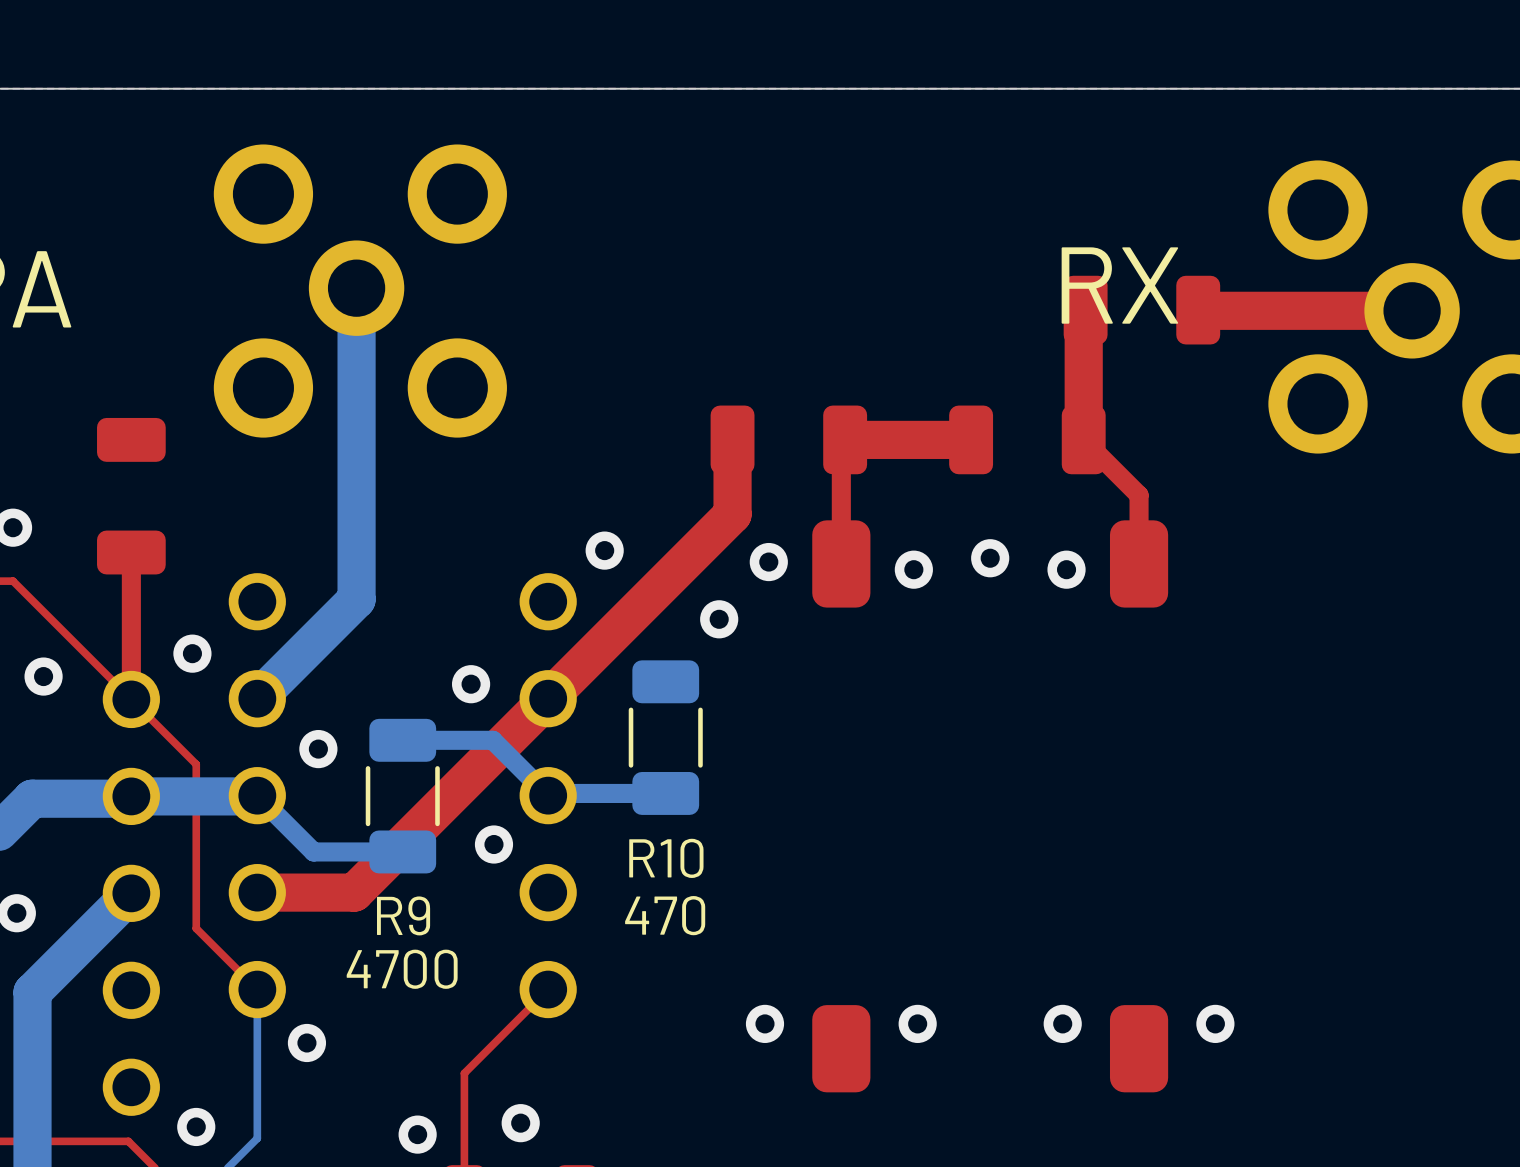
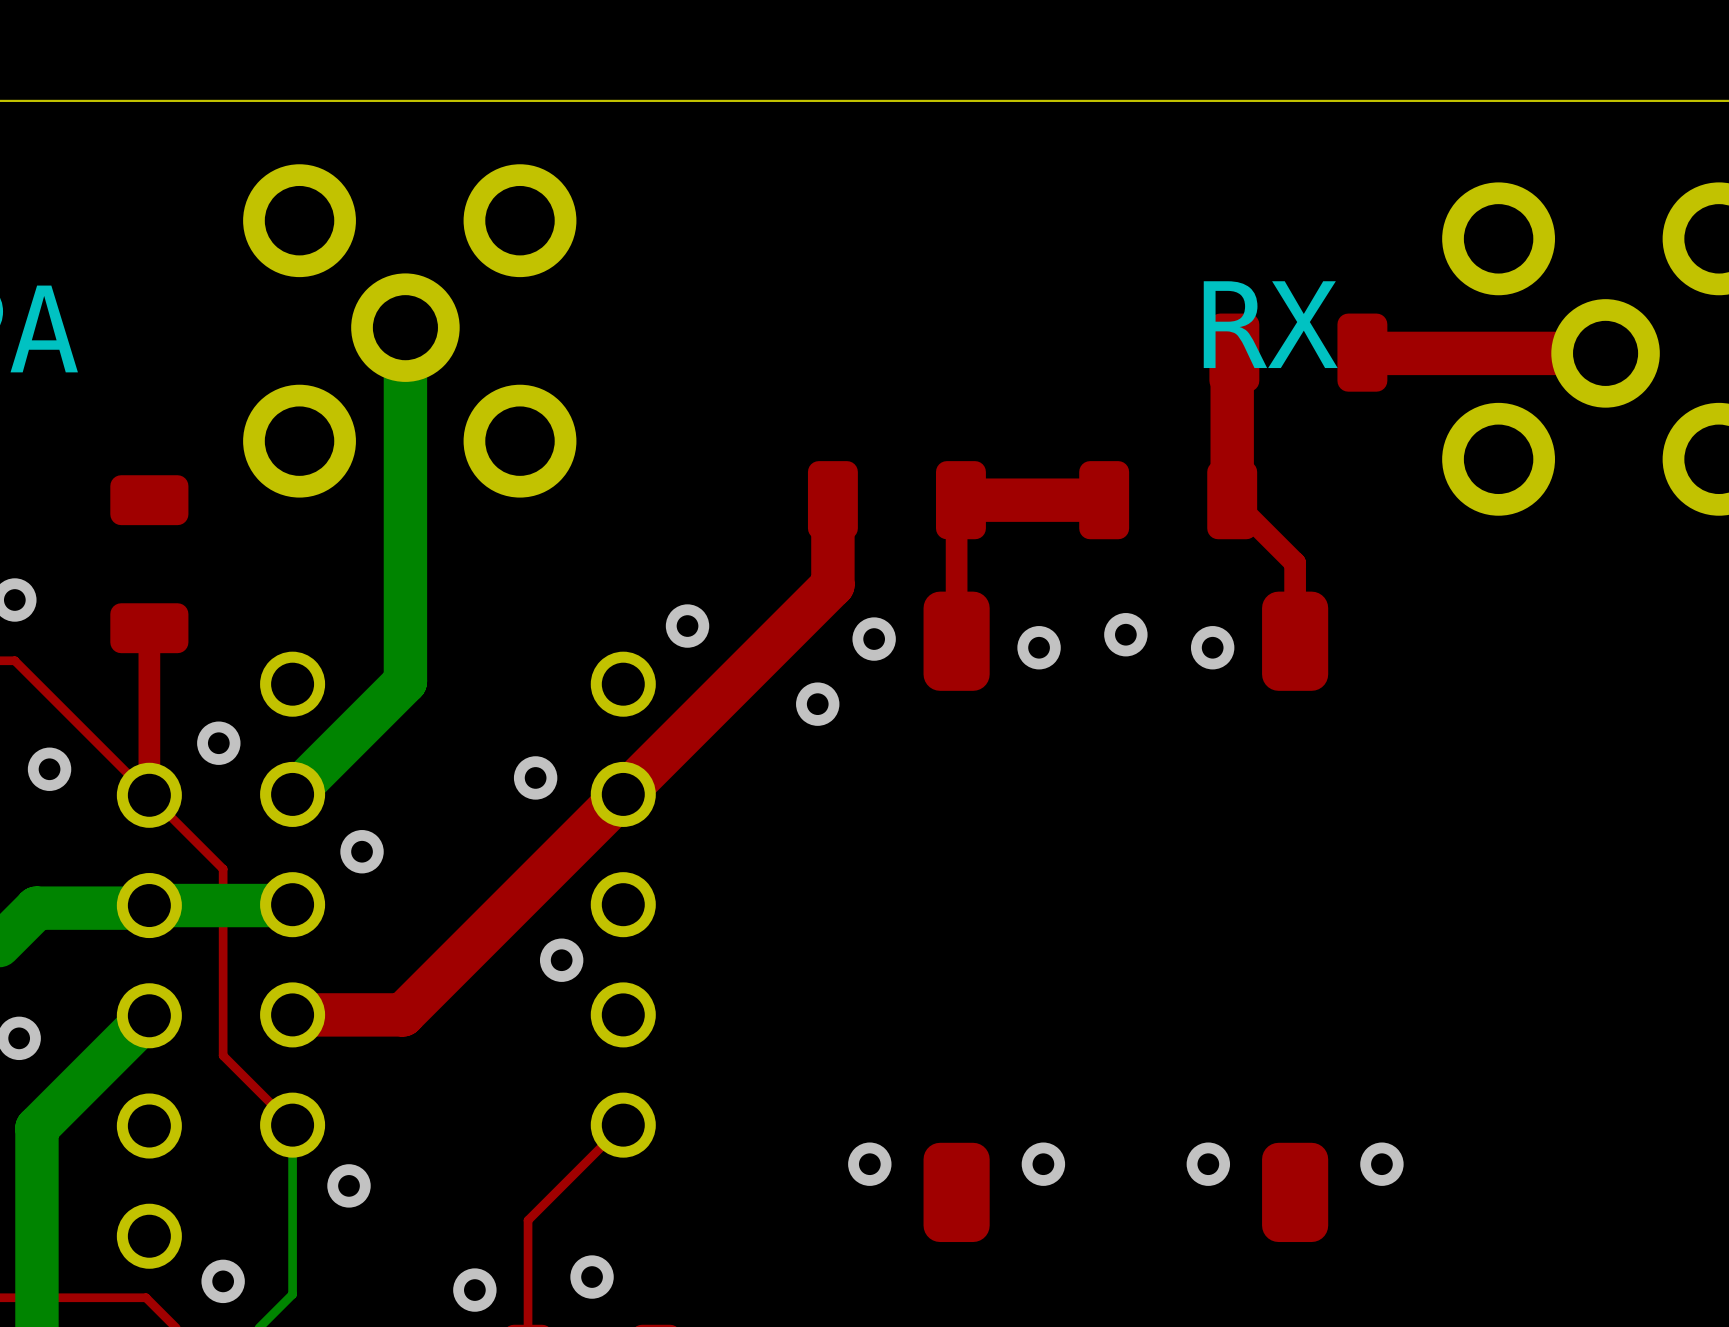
R10: 470 (665, 737) -> none
bottom track: (402, 740) (492, 740) (548, 795) -> none
bottom track: (665, 793) (550, 793) -> none
bottom track: (257, 795) (313, 851) (402, 851) -> none
R9: 4700 (402, 796) -> none

